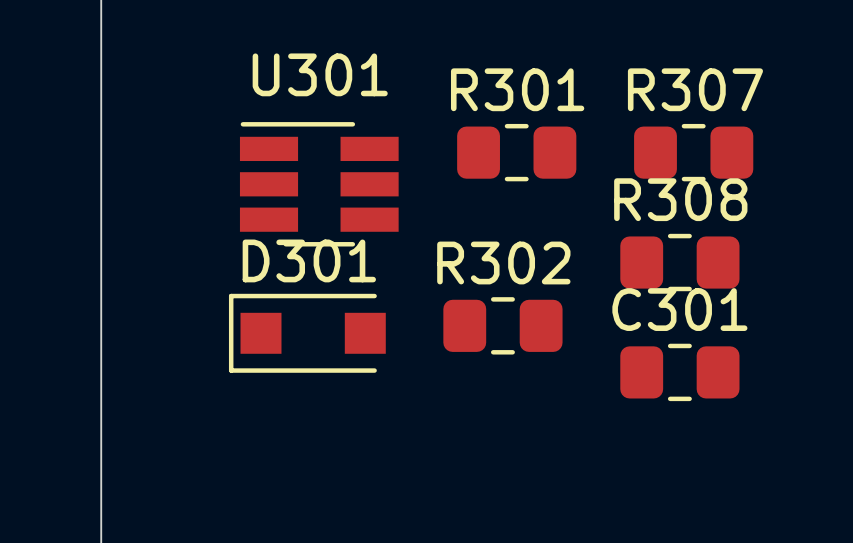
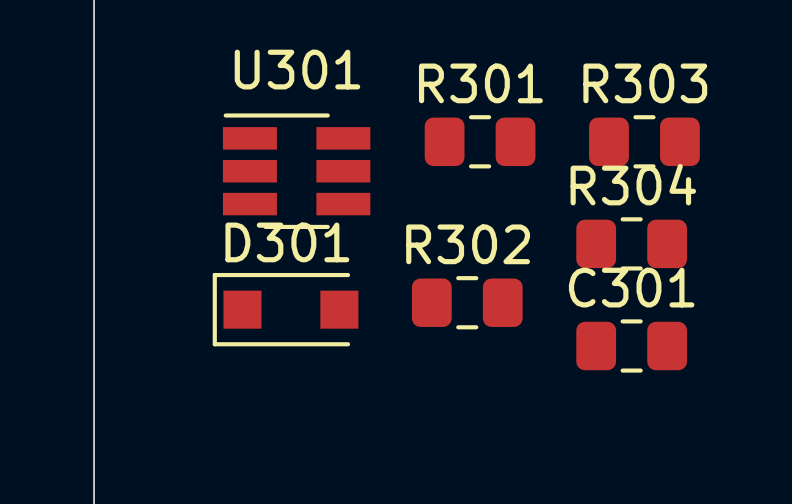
R307 name: R307 (695, 89) -> R303 (645, 83)
R308 name: R308 (680, 199) -> R304 (633, 184)

